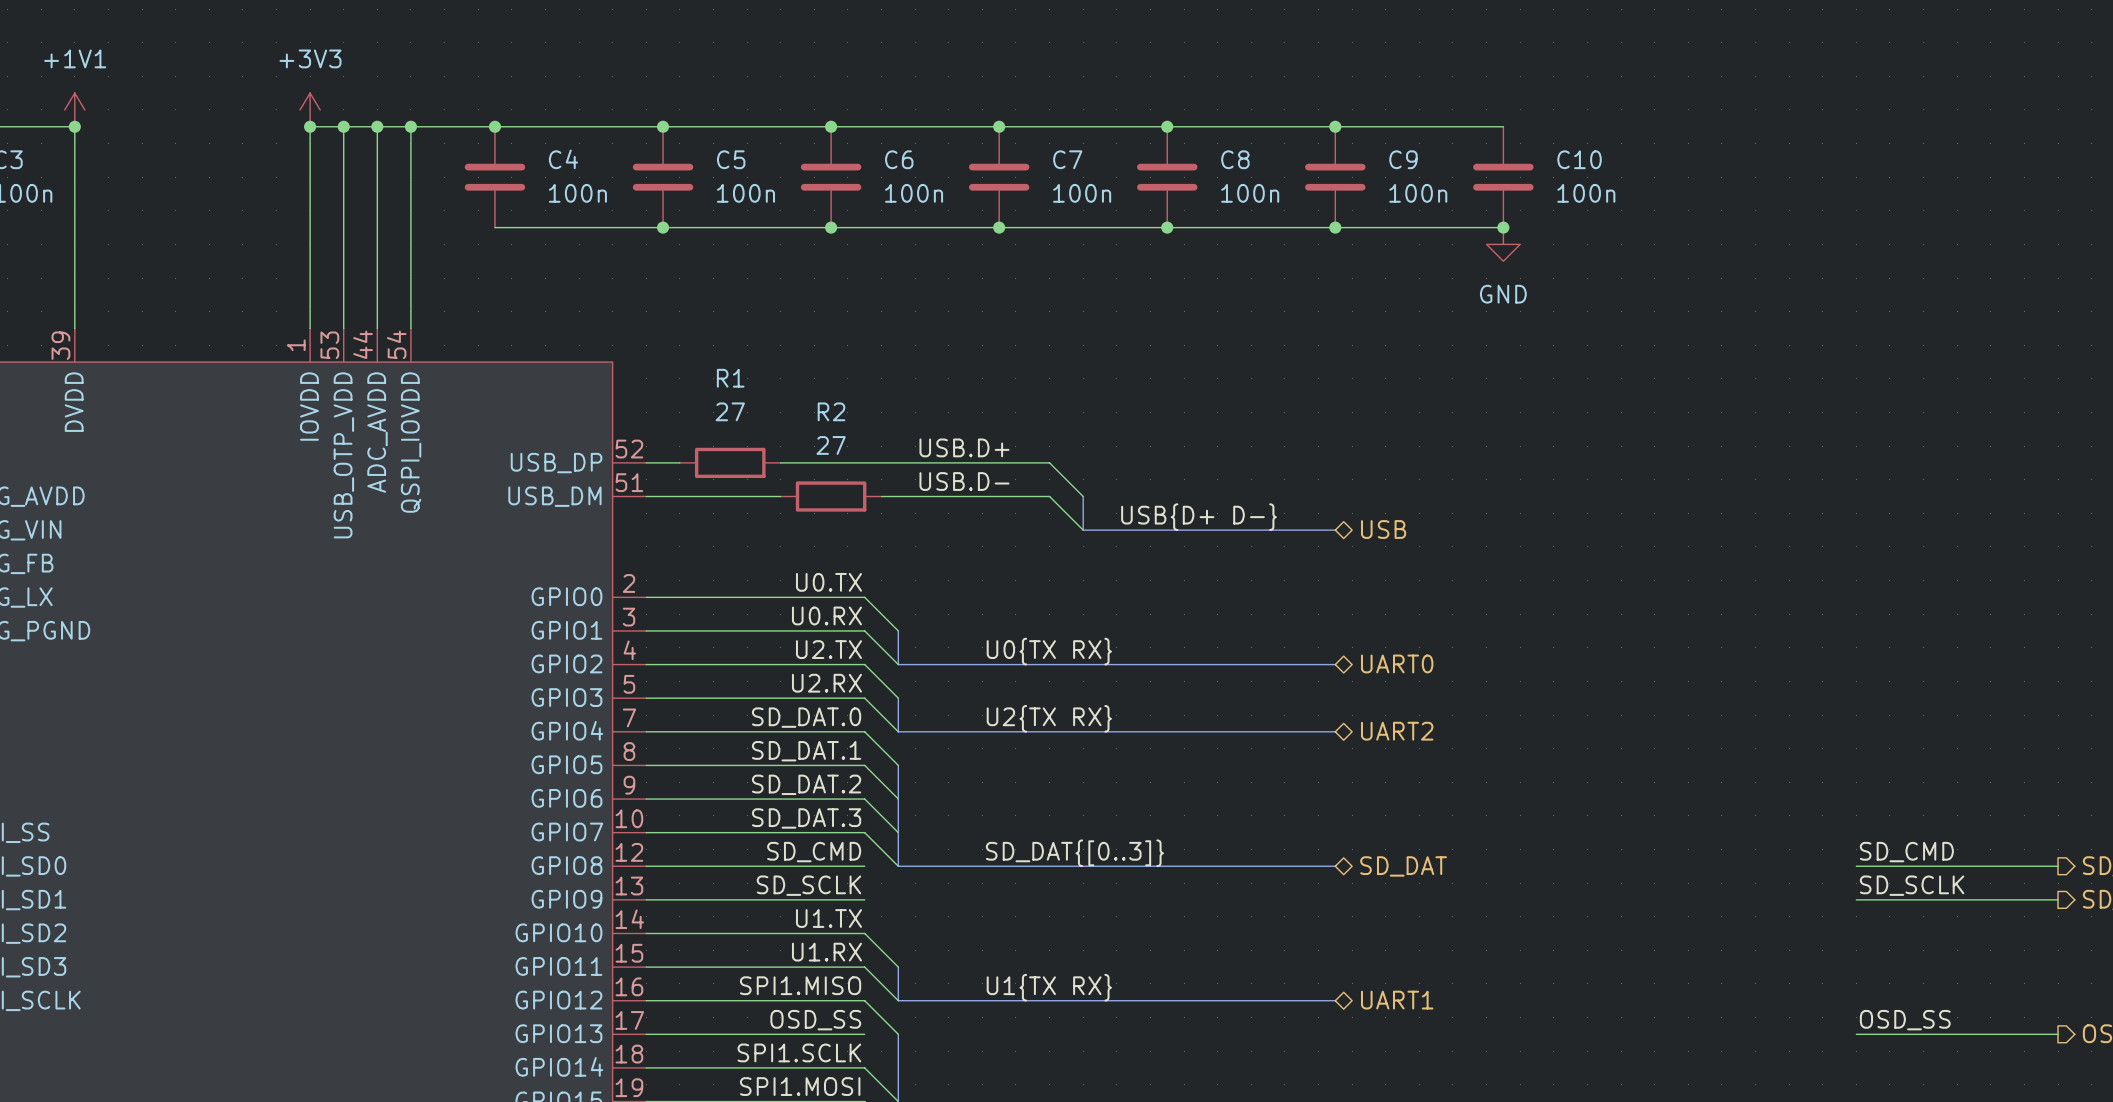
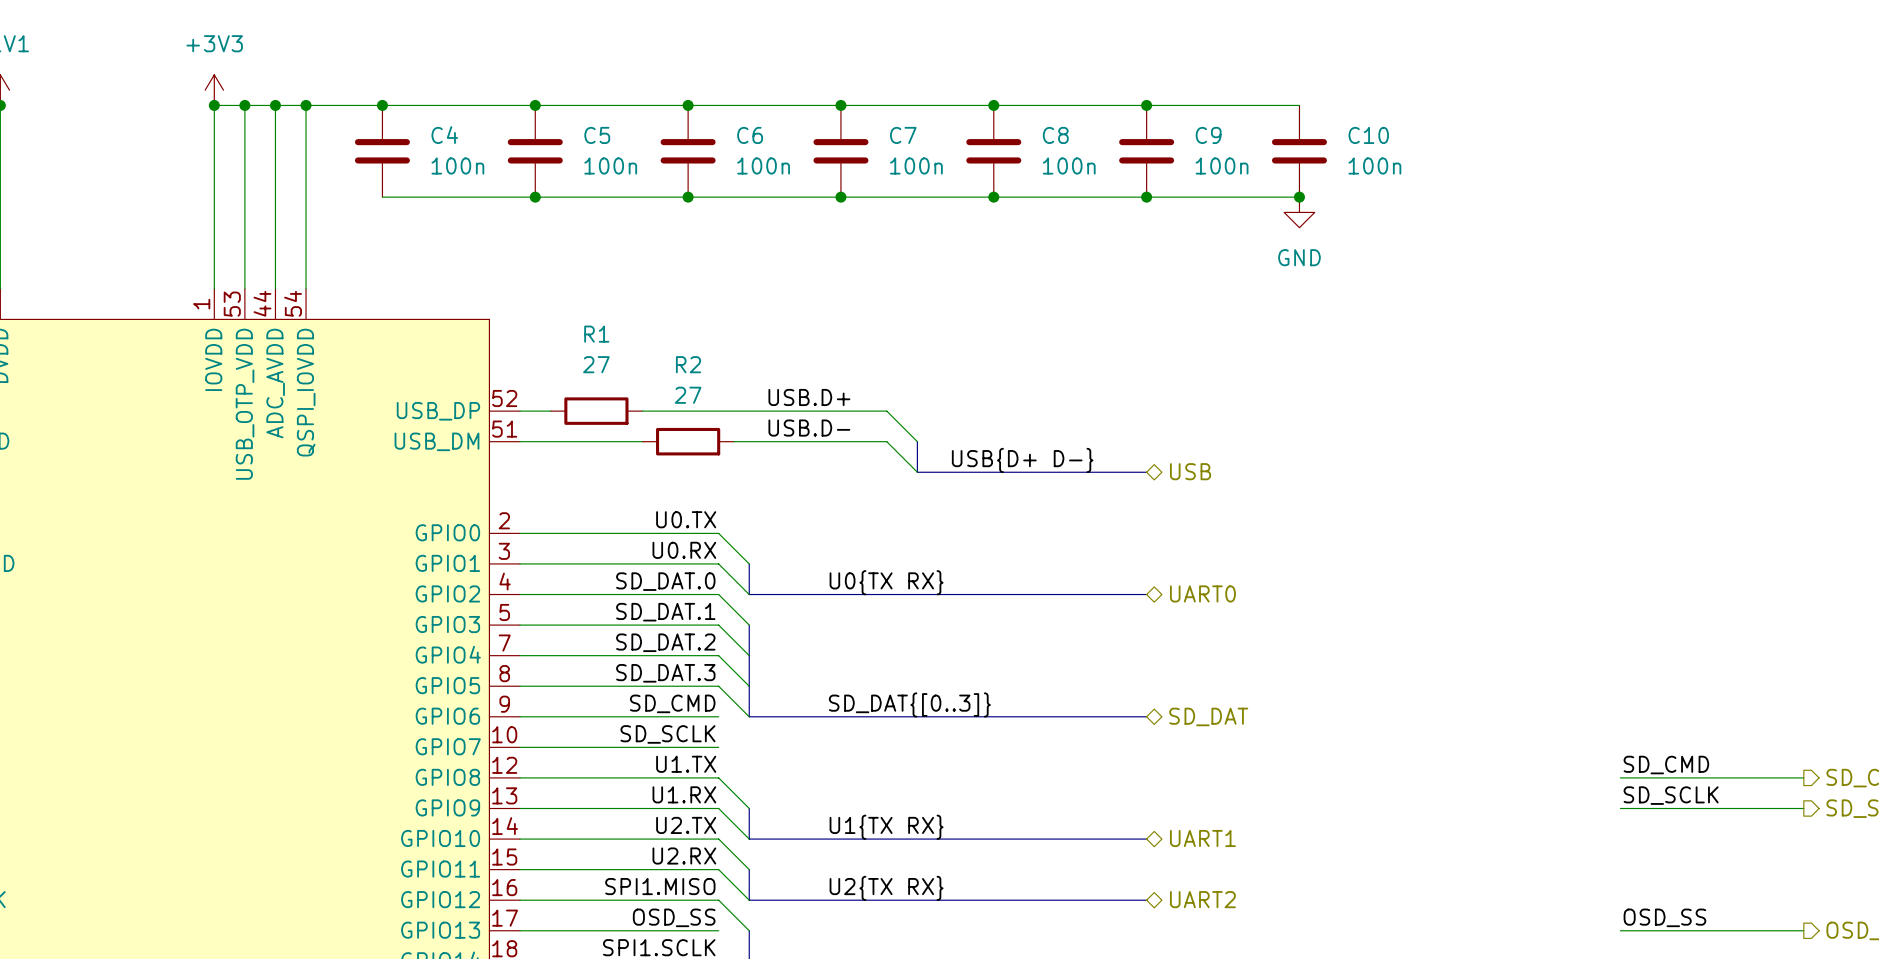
label: U2.TX (828, 649) -> SD_DAT.0 (665, 581)
label: U2.RX (826, 683) -> SD_DAT.1 (665, 612)
label: SD_DAT.0 (806, 717) -> SD_DAT.2 (665, 642)
label: U2{TX RX} (1049, 718) -> none
bus: (898, 731) (1335, 731) -> (749, 655) (749, 686)
hierarchical label: UART2 (1397, 731) -> none
label: SD_DAT.1 (806, 751) -> SD_DAT.3 (665, 673)
label: SD_DAT.2 (806, 784) -> SD_CMD (672, 703)
wire: (864, 799) (898, 832) -> (718, 777) (749, 808)
bus: (898, 799) (898, 866) (1335, 866) -> (749, 716) (1146, 716)
label: SD_DAT.3 (806, 818) -> SD_SCLK (667, 734)
wire: (864, 832) (898, 866) -> (718, 808) (749, 839)
label: SD_CMD (814, 852) -> U1.TX (686, 764)
label position: SD_DAT{[0..3]} (1074, 853) -> SD_DAT{[0..3]} (909, 704)
hierarchical label position: SD_DAT (1403, 866) -> SD_DAT (1208, 716)
label: SD_SCLK (808, 885) -> U1.RX (684, 794)
bus: none -> (749, 808) (749, 839) (1146, 839)
label: U1.TX (828, 918) -> U2.TX (686, 825)
label: none -> U1{TX RX} (886, 827)
hierarchical label: none -> UART1 (1202, 838)
label: U1.RX (826, 952) -> U2.RX (684, 855)
label: U1{TX RX} (1049, 987) -> U2{TX RX} (886, 888)
hierarchical label: UART1 (1397, 1000) -> UART2 (1202, 899)

